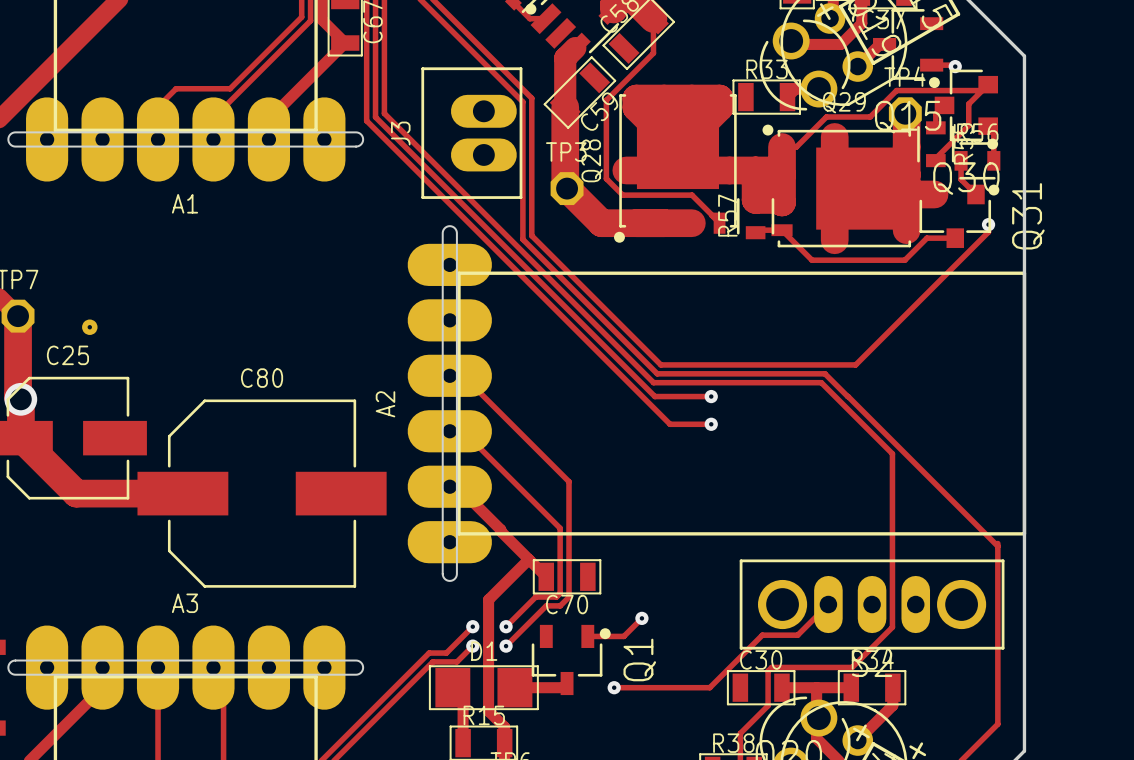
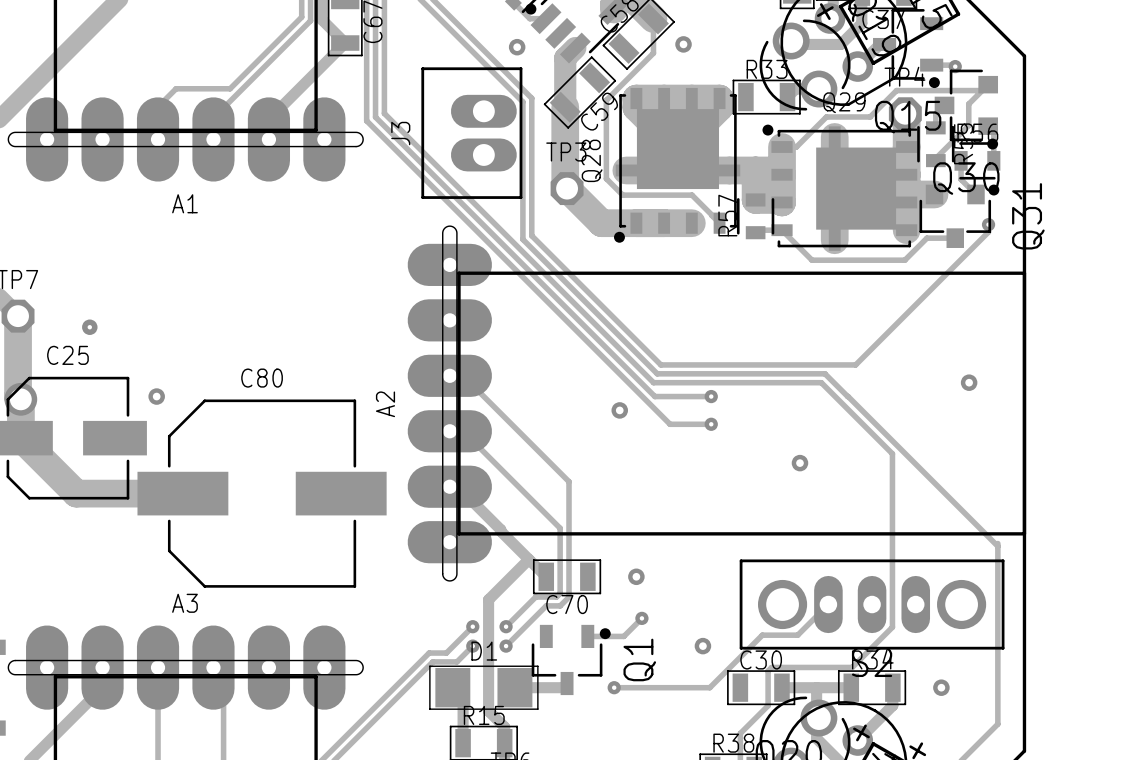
via: none -> (683, 44)
via: none -> (517, 47)
via: none -> (969, 382)
via: none -> (156, 396)
via: none -> (619, 410)
via: none -> (799, 463)
via: none -> (636, 576)
via: none -> (702, 646)
via: none -> (941, 687)

